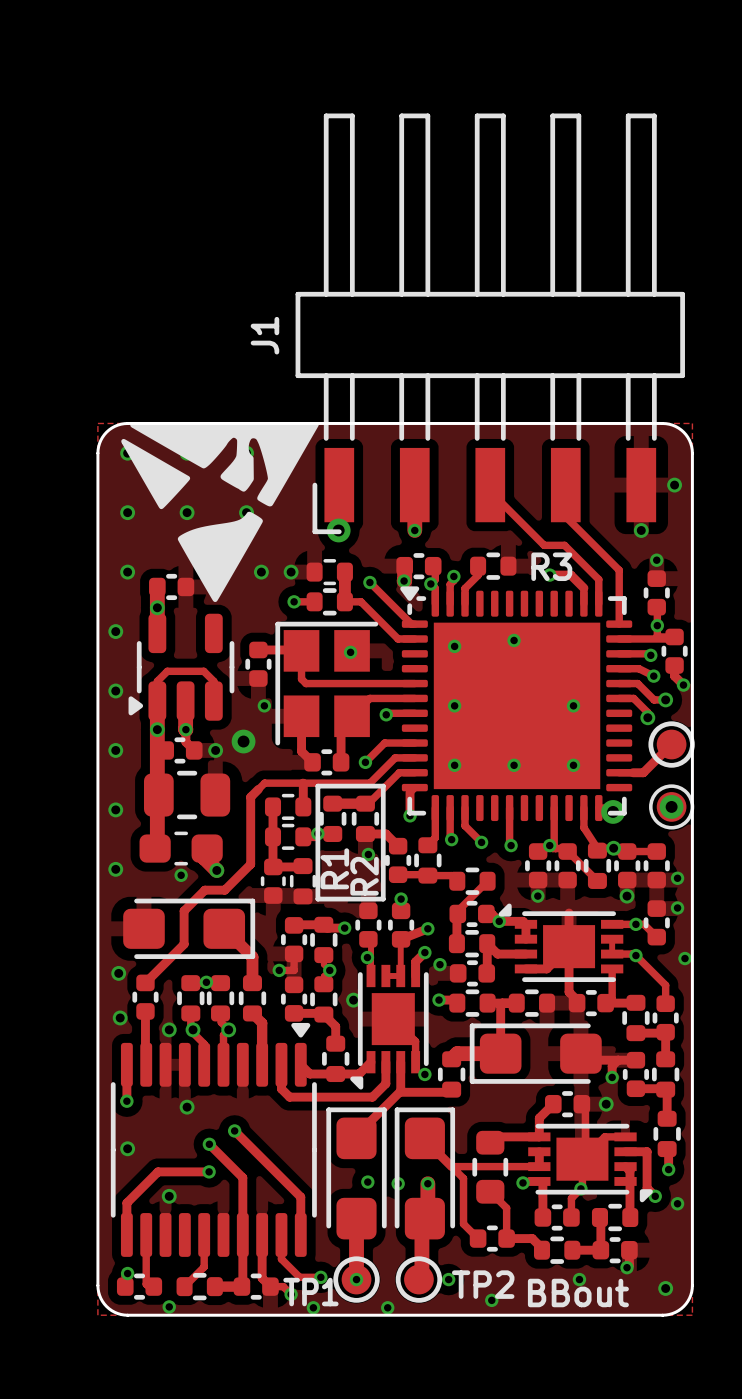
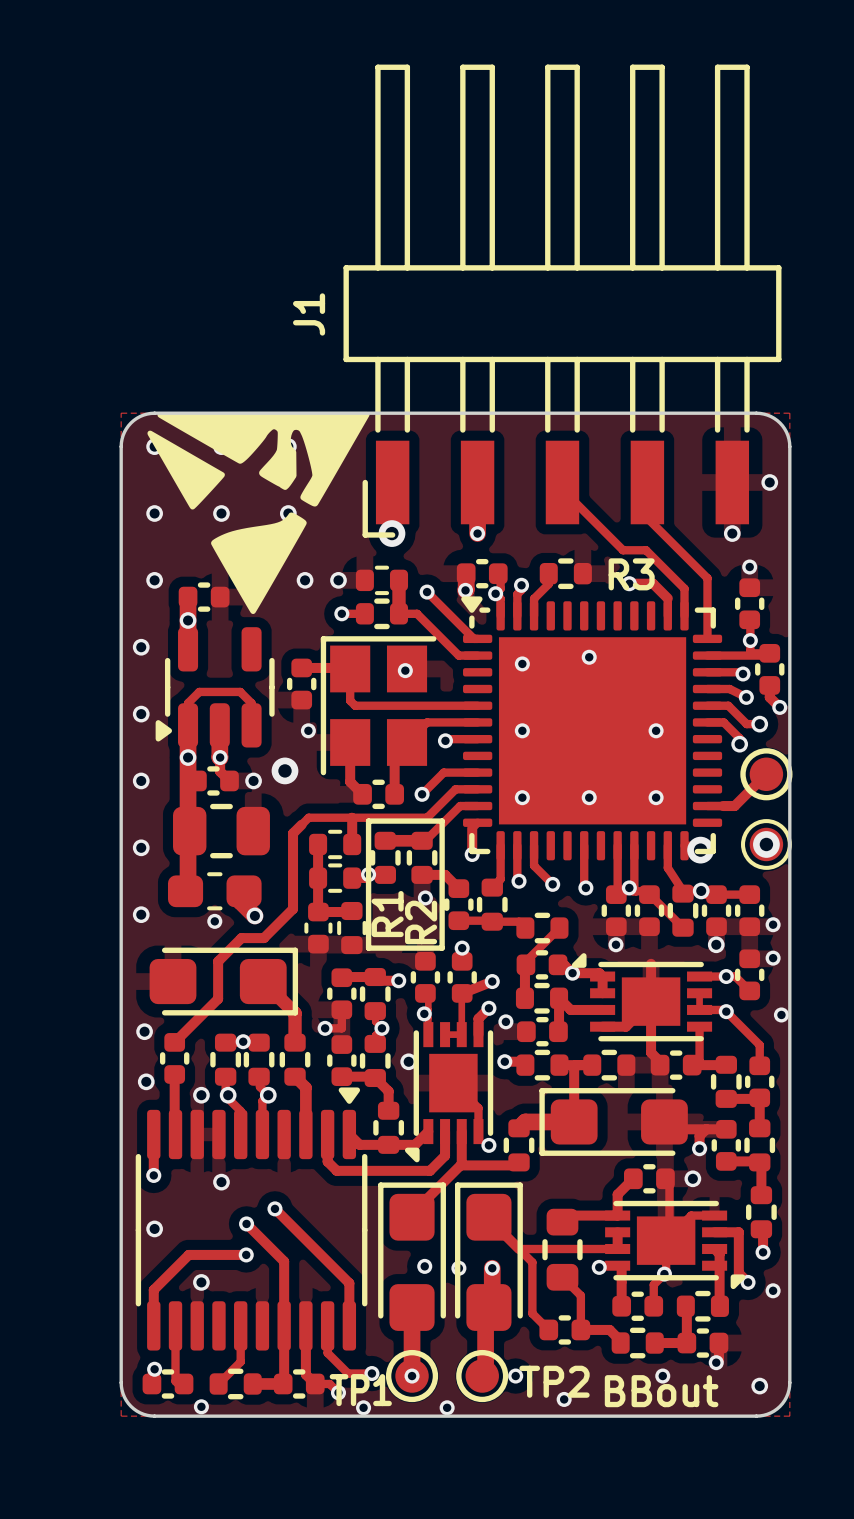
track: none -> (617, 845) (616, 894)

